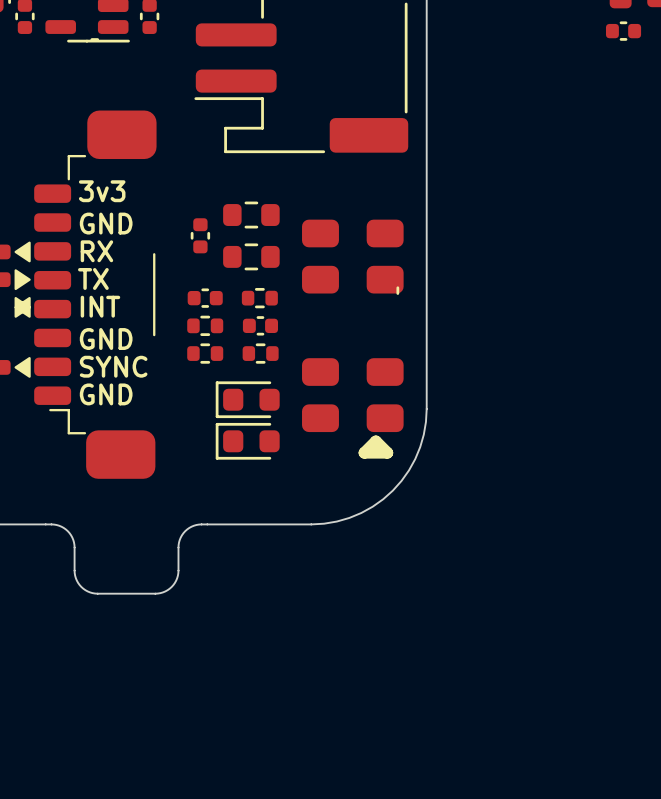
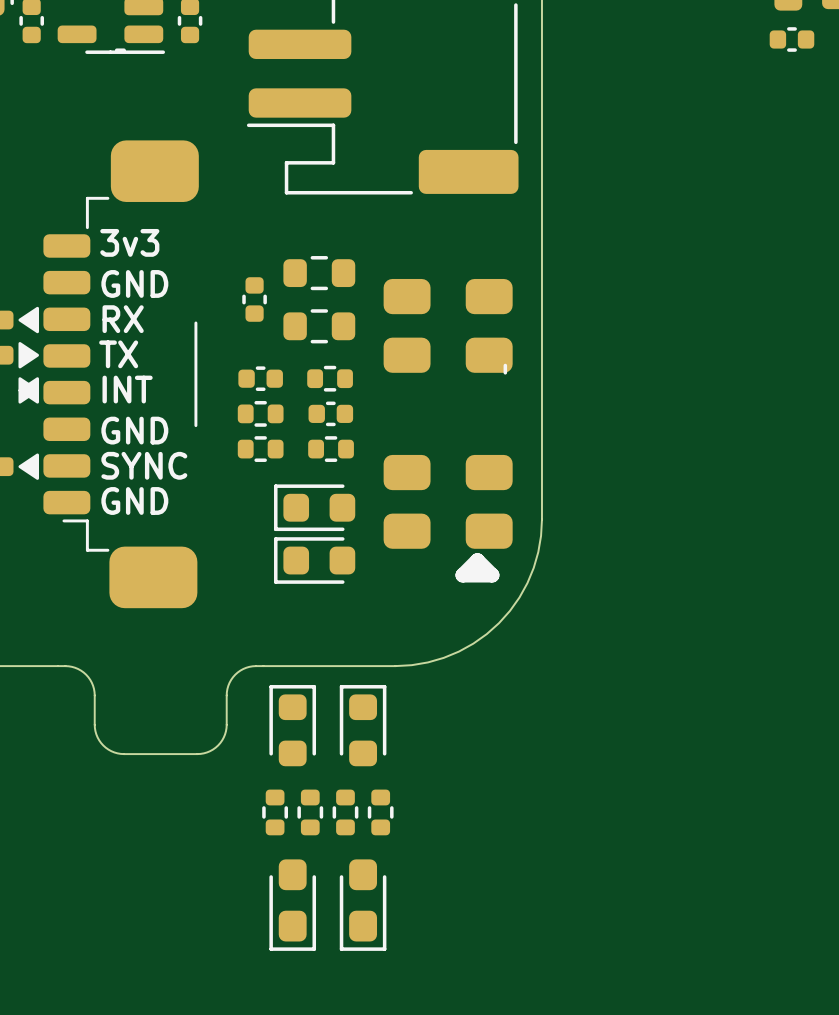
part: none -> (292, 725)
part: none -> (363, 725)
part: none -> (275, 812)
part: none -> (310, 812)
part: none -> (345, 812)
part: none -> (380, 812)
part: none -> (292, 905)
part: none -> (363, 905)

